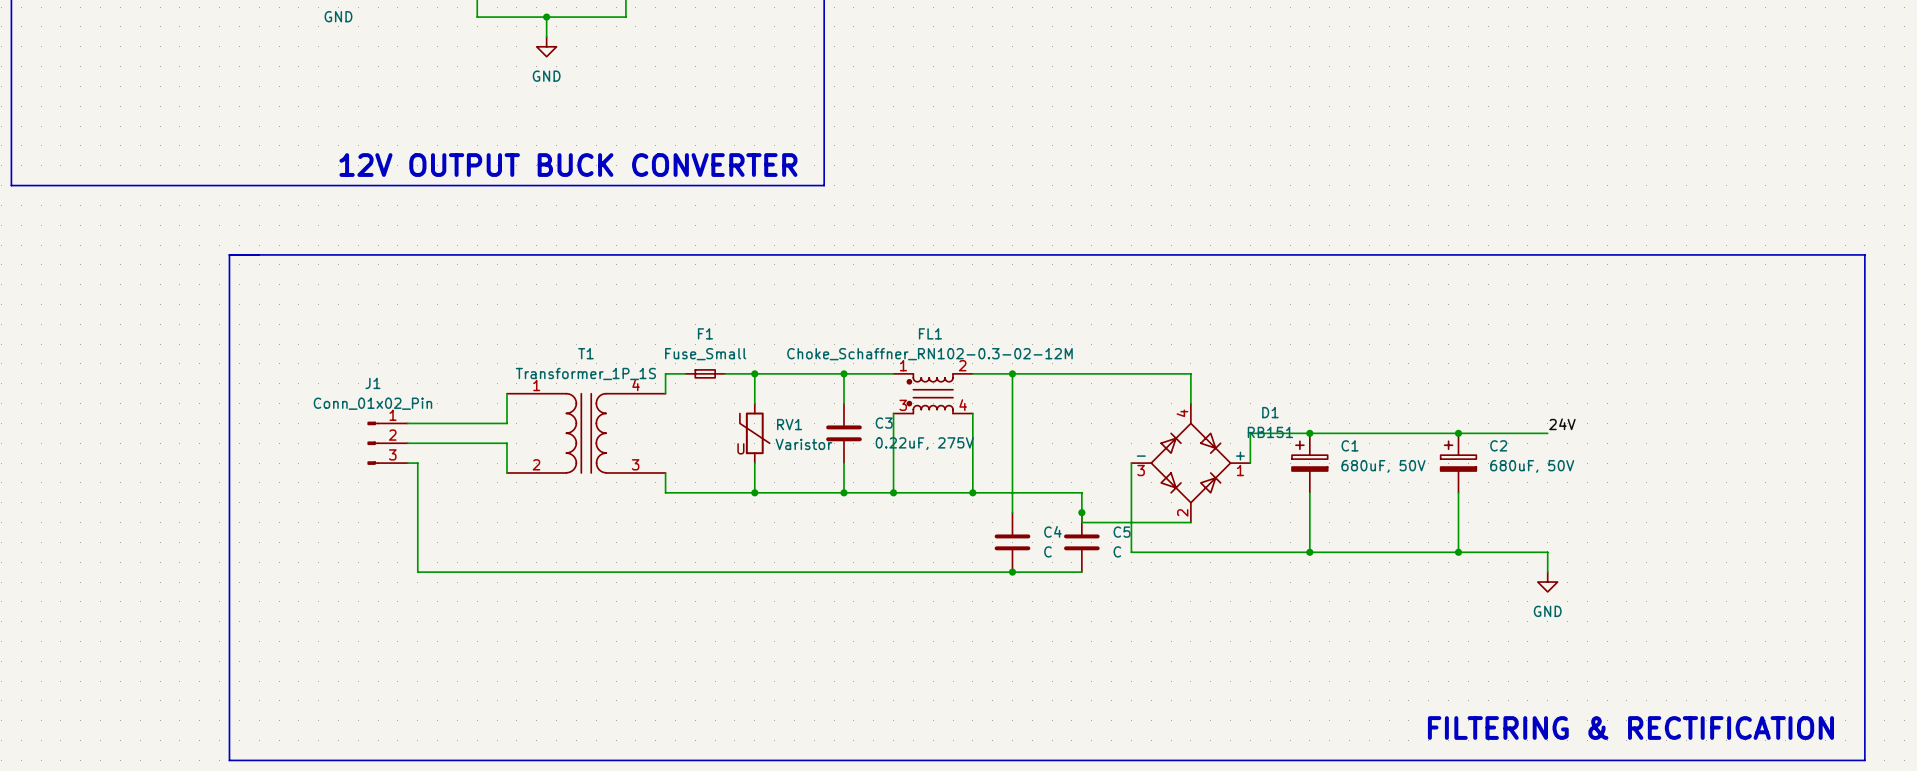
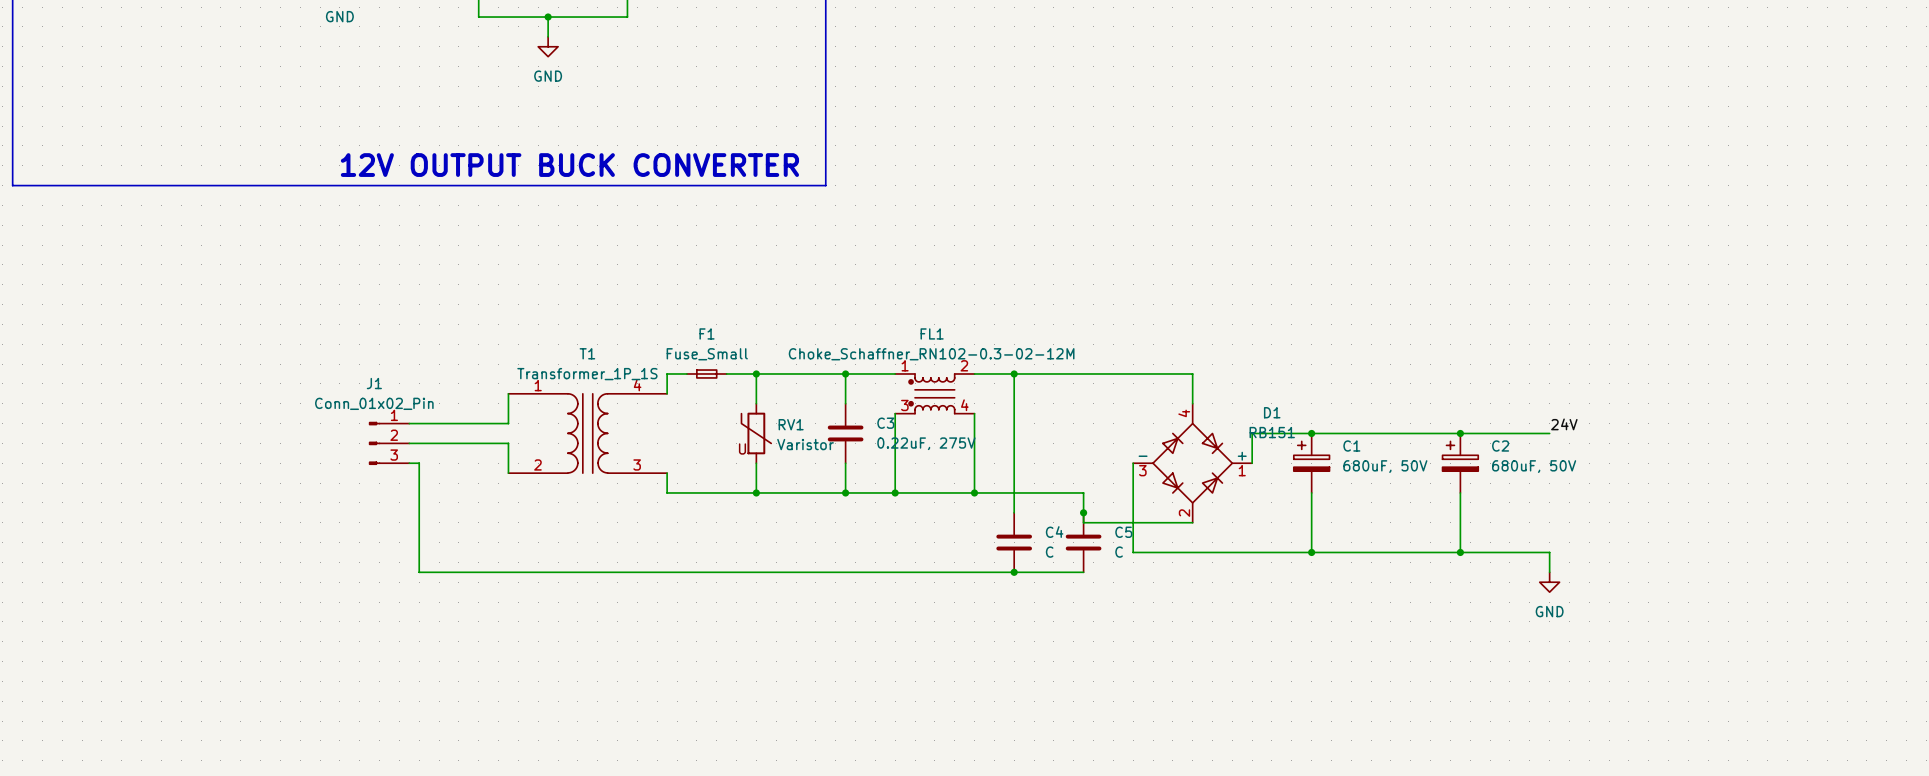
line: (229, 254) (1864, 254) (1864, 760) (229, 760) (229, 254) -> none
text: FILTERING & RECTIFICATION (1630, 728) -> none

